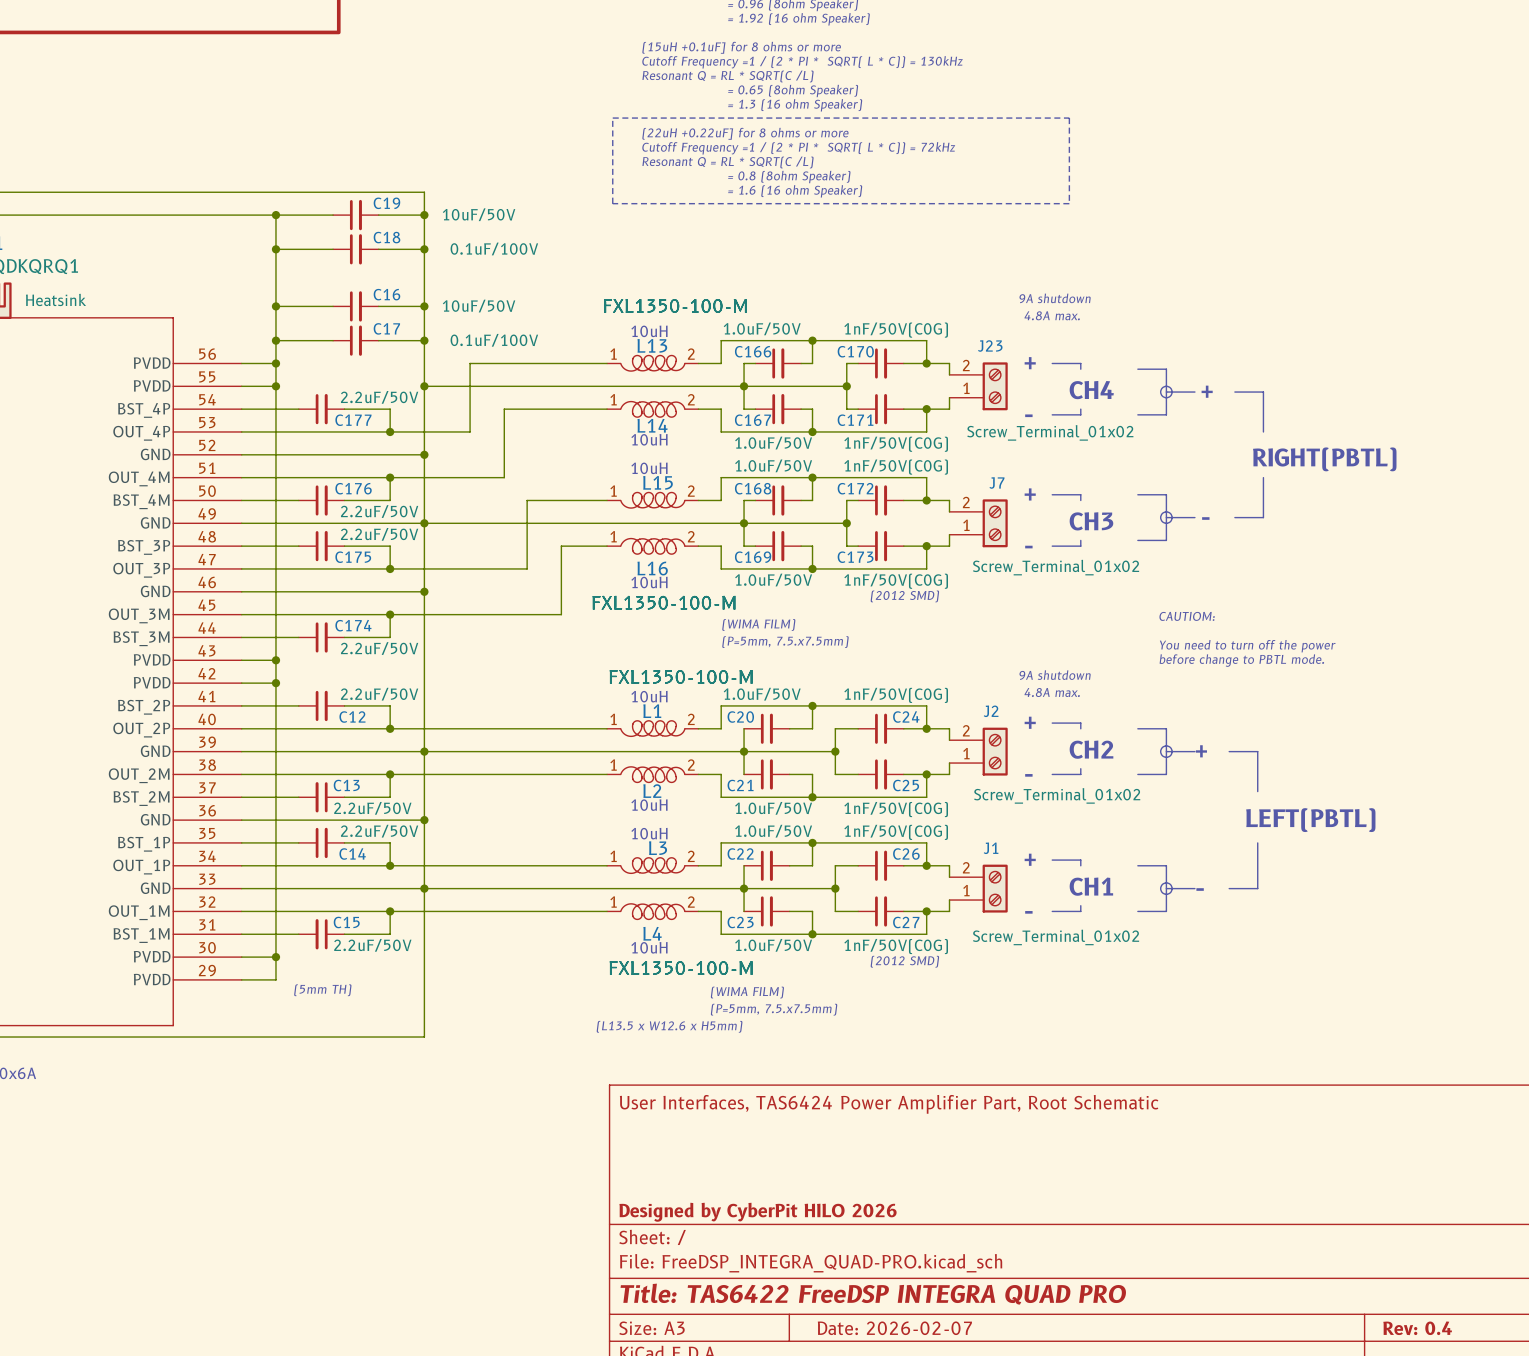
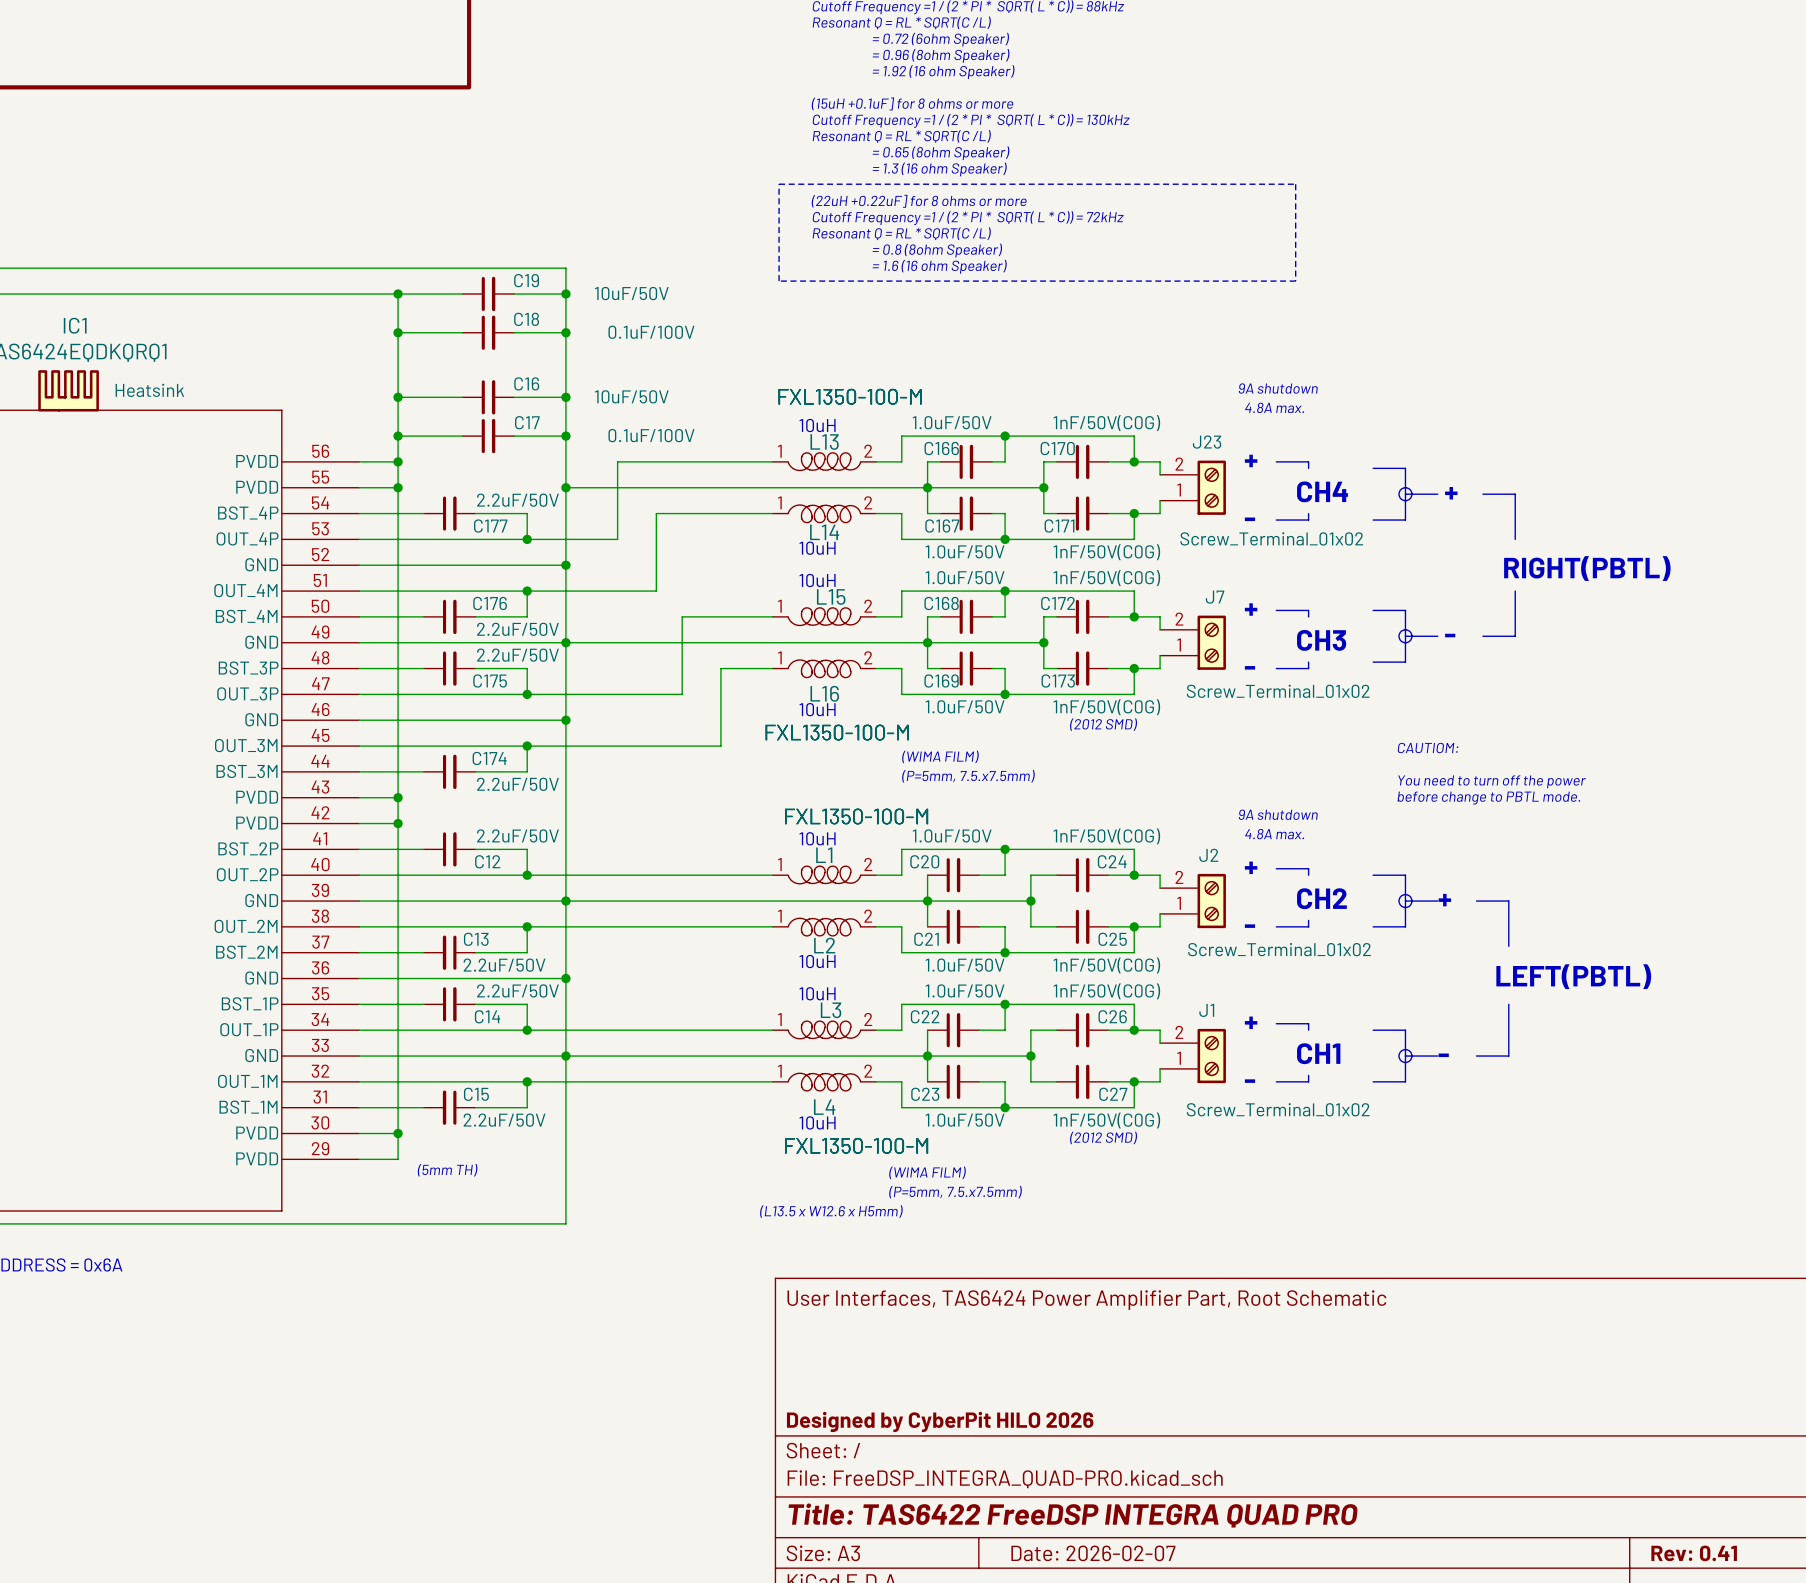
title block: Rev: 0.4 (1417, 1328) -> Rev: 0.41 (1694, 1553)

